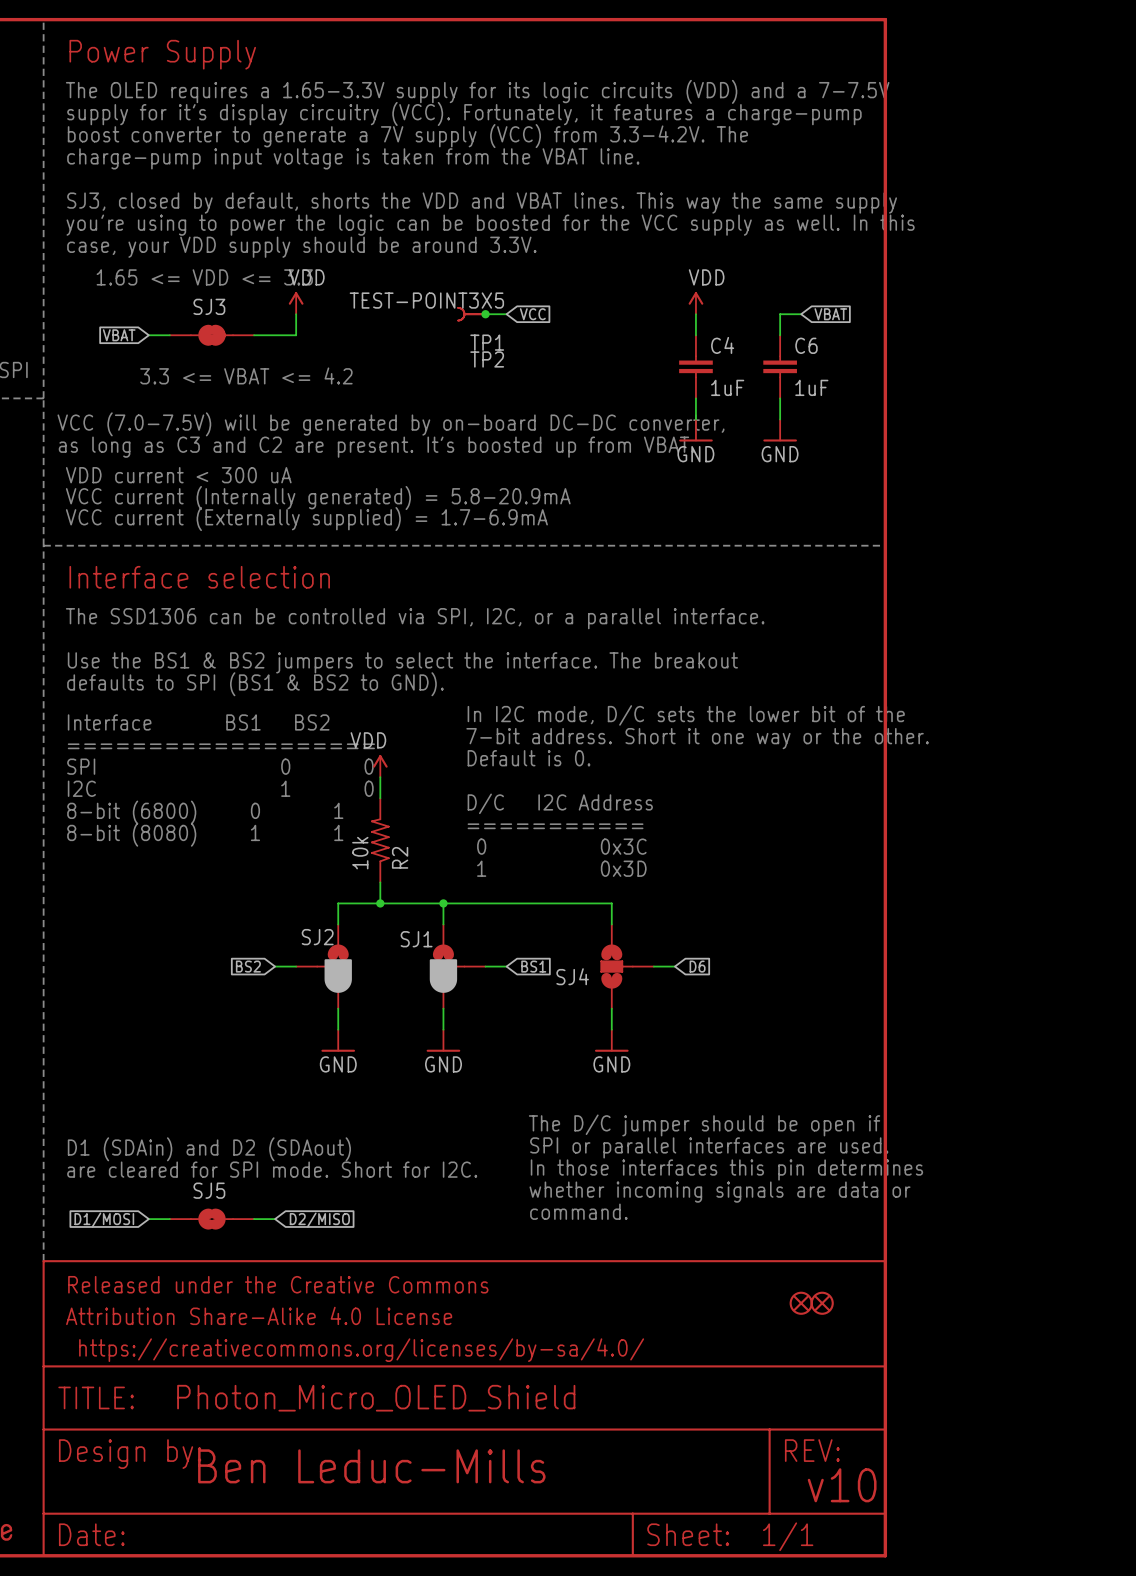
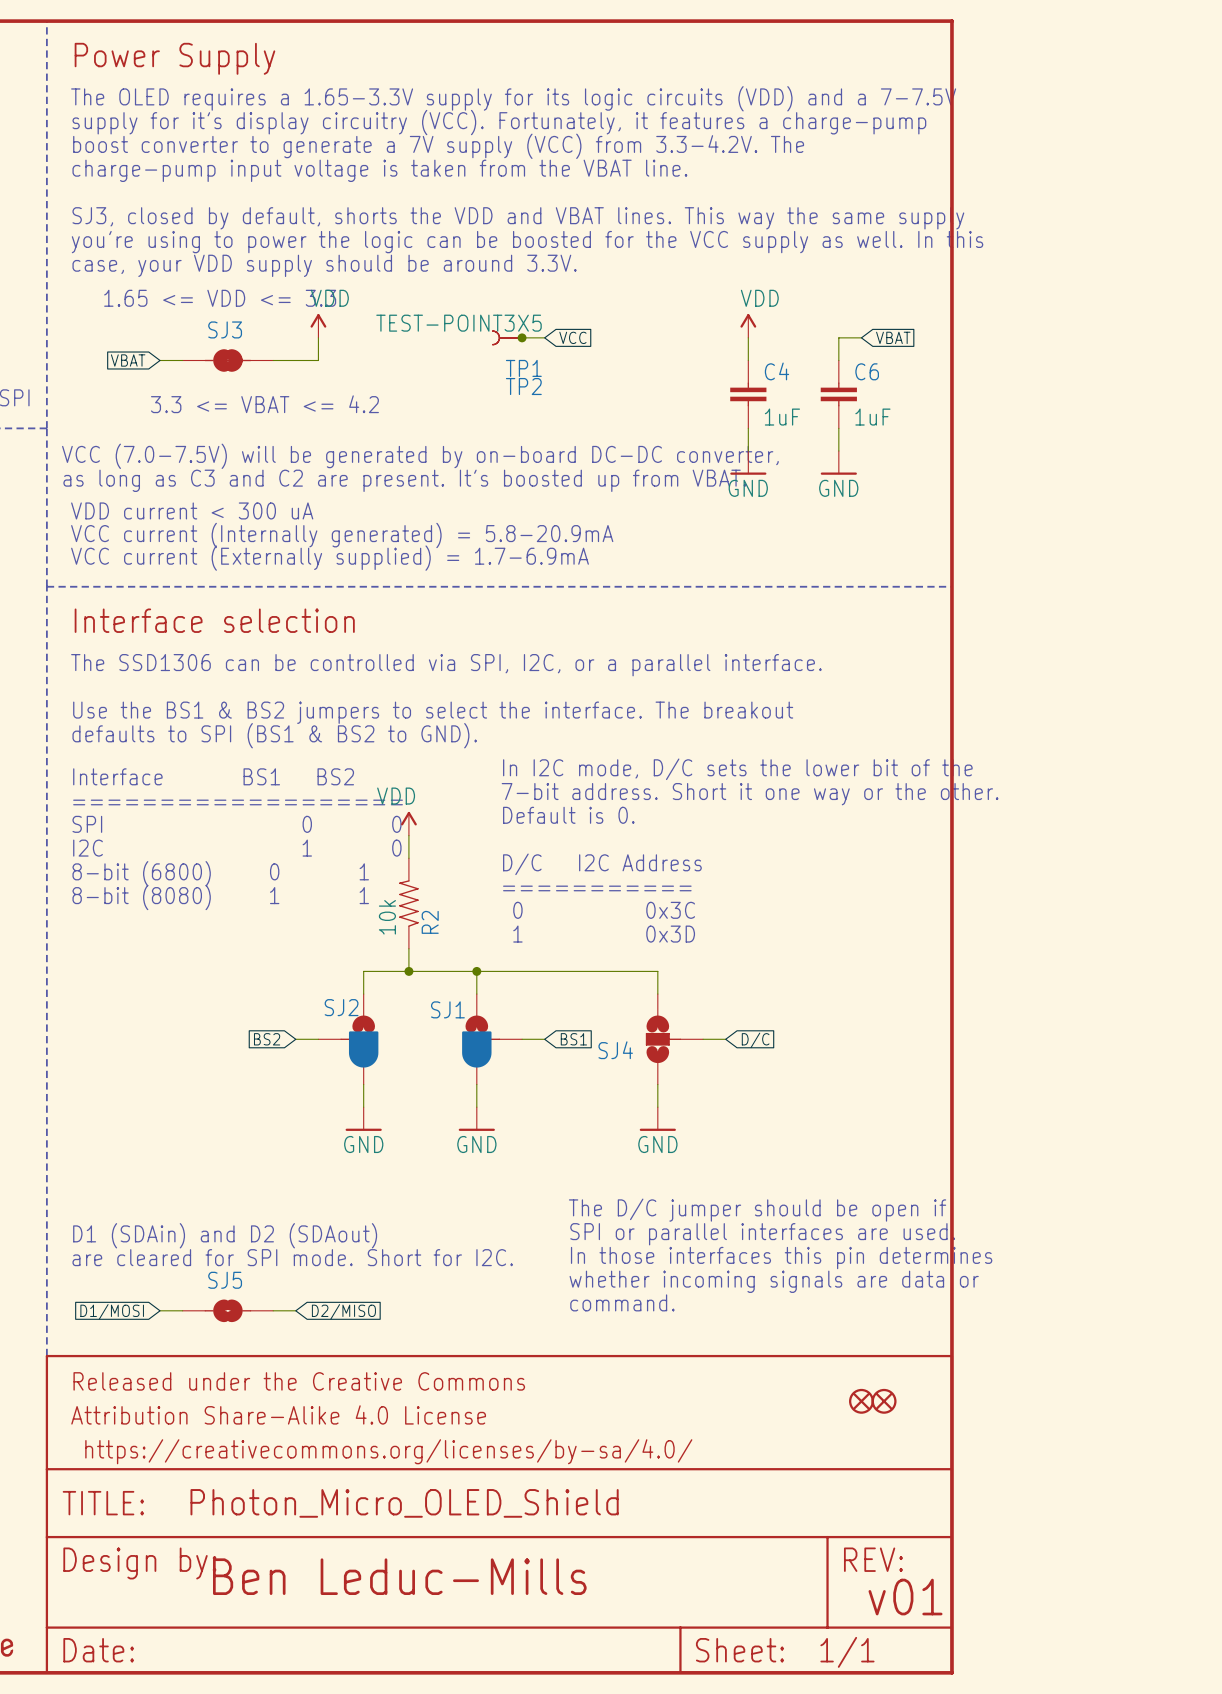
global label: D6 (697, 966) -> D/C (755, 1040)
text: v10 (842, 1485) -> v01 (905, 1597)

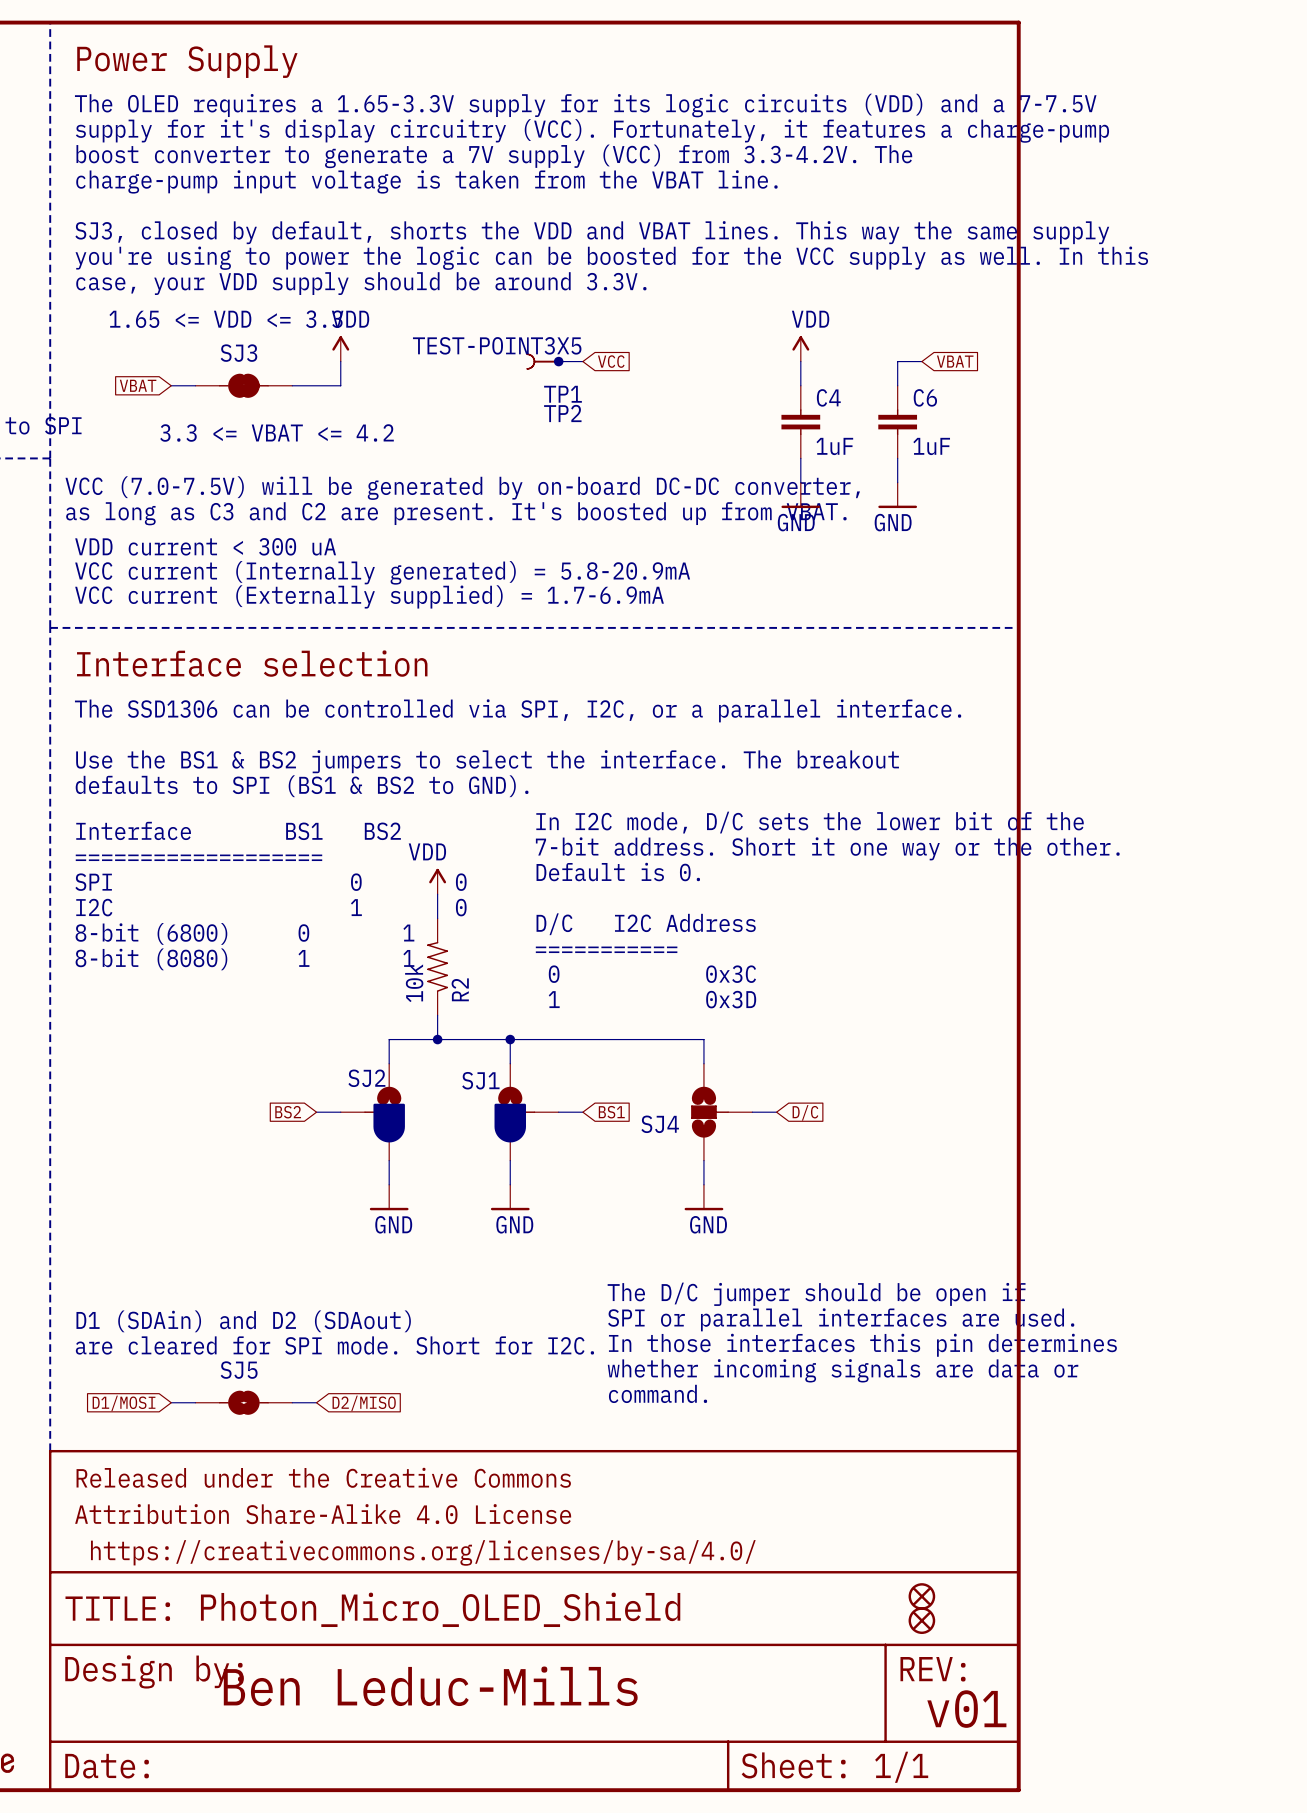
part: (861, 1401) -> none
part: (884, 1401) -> none
part: none -> (921, 1596)
part: none -> (921, 1620)

